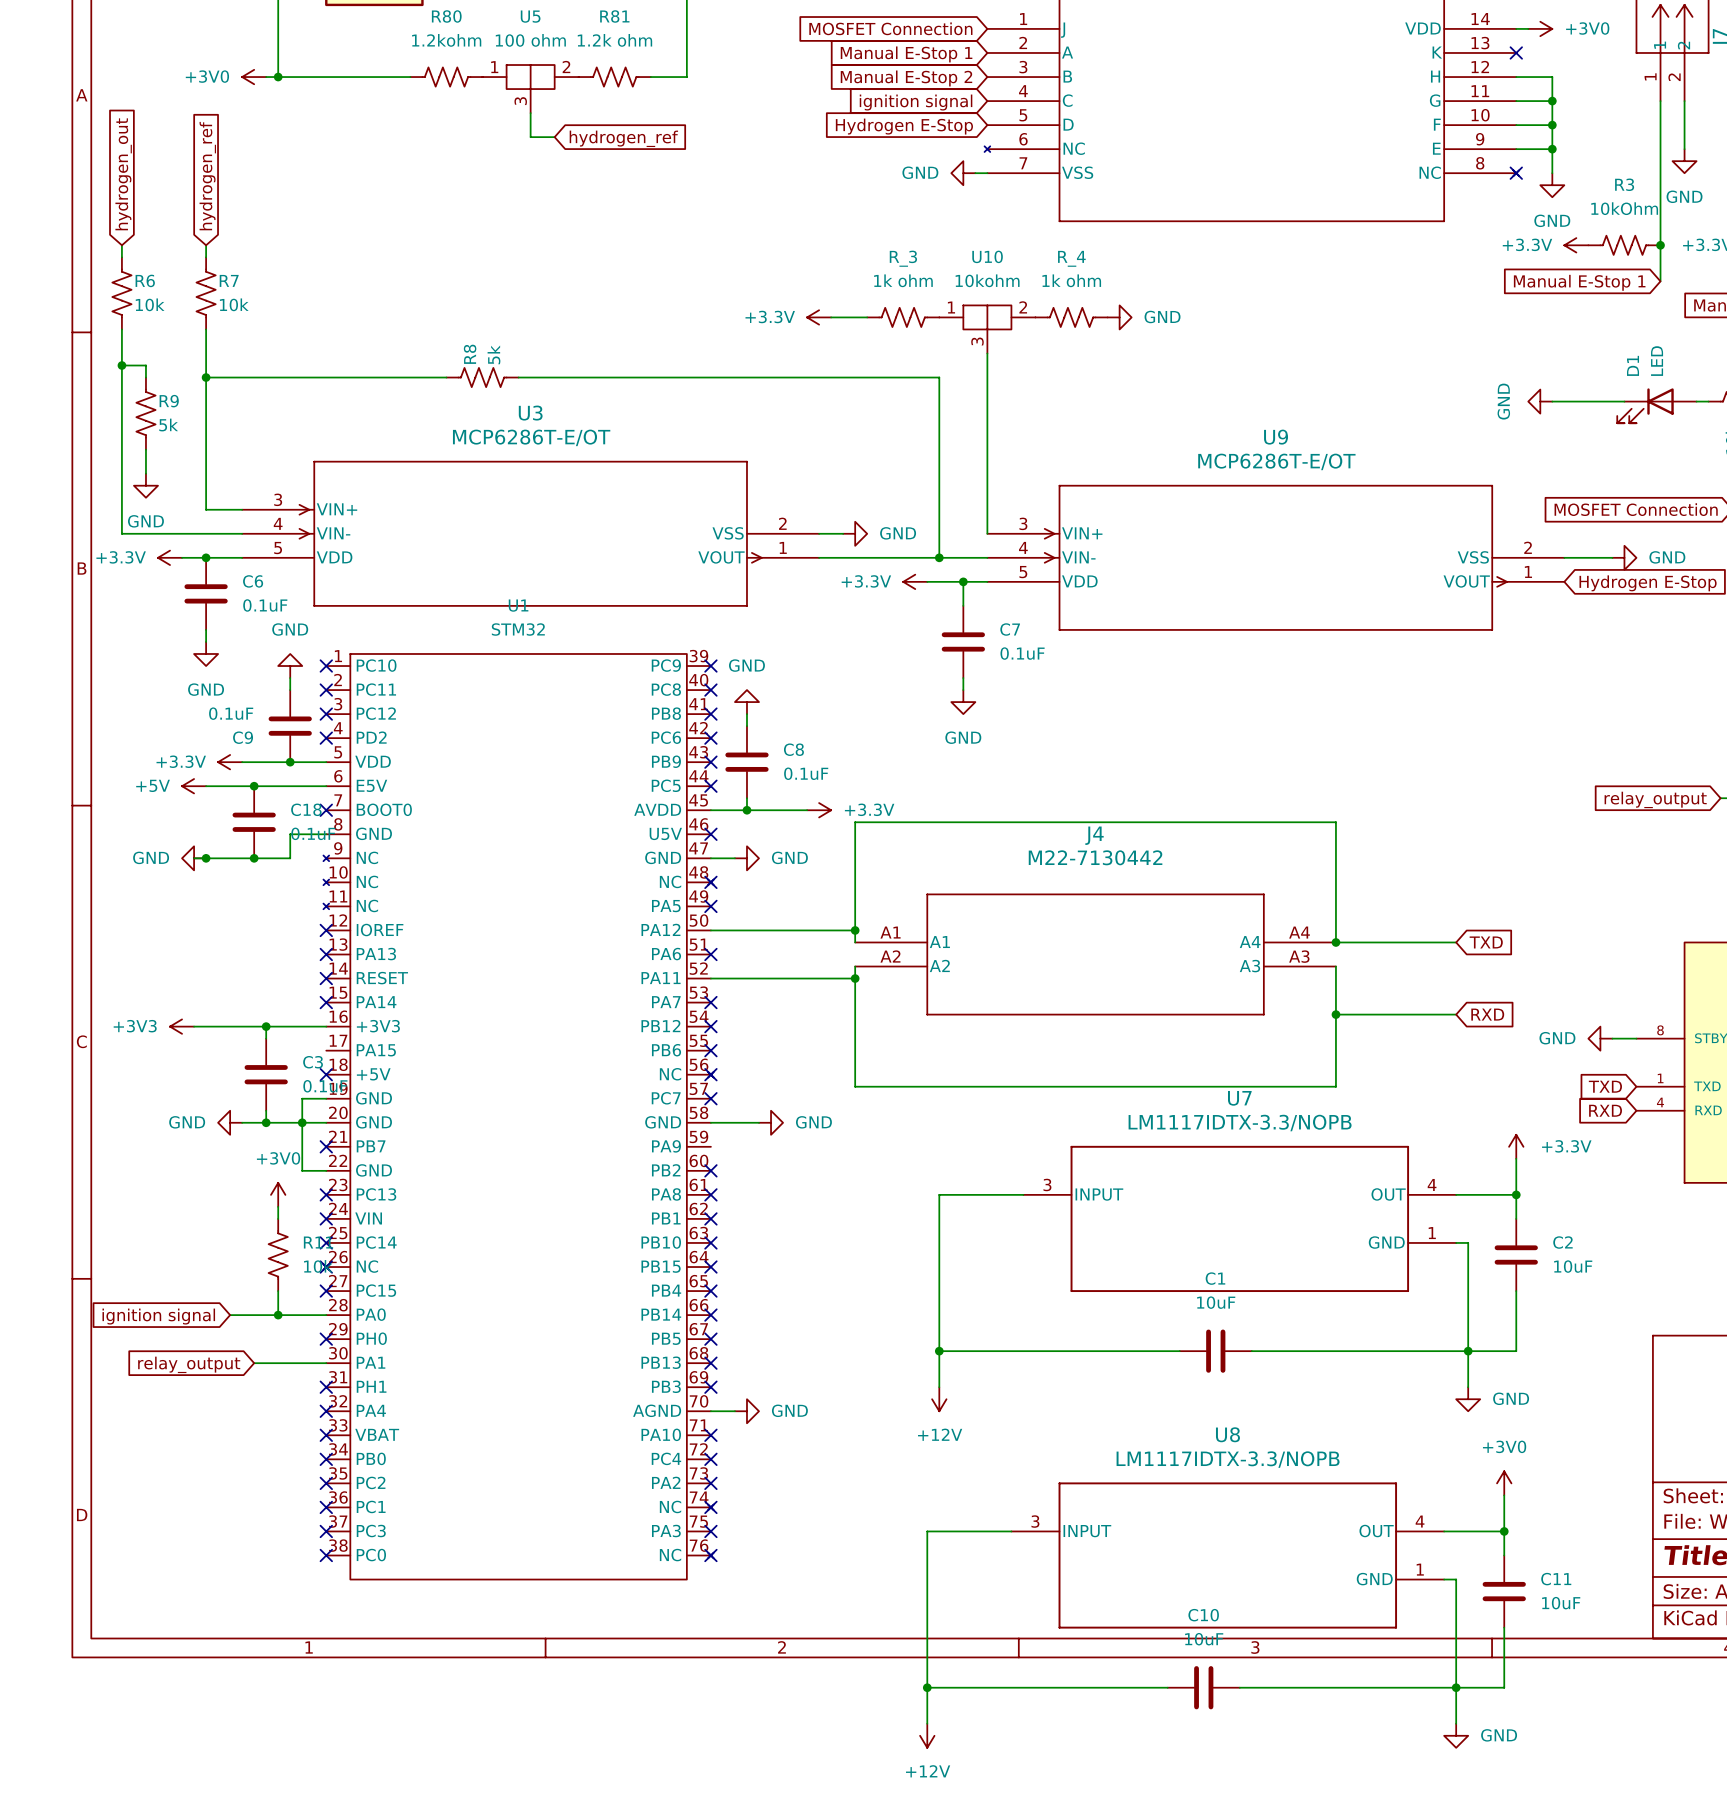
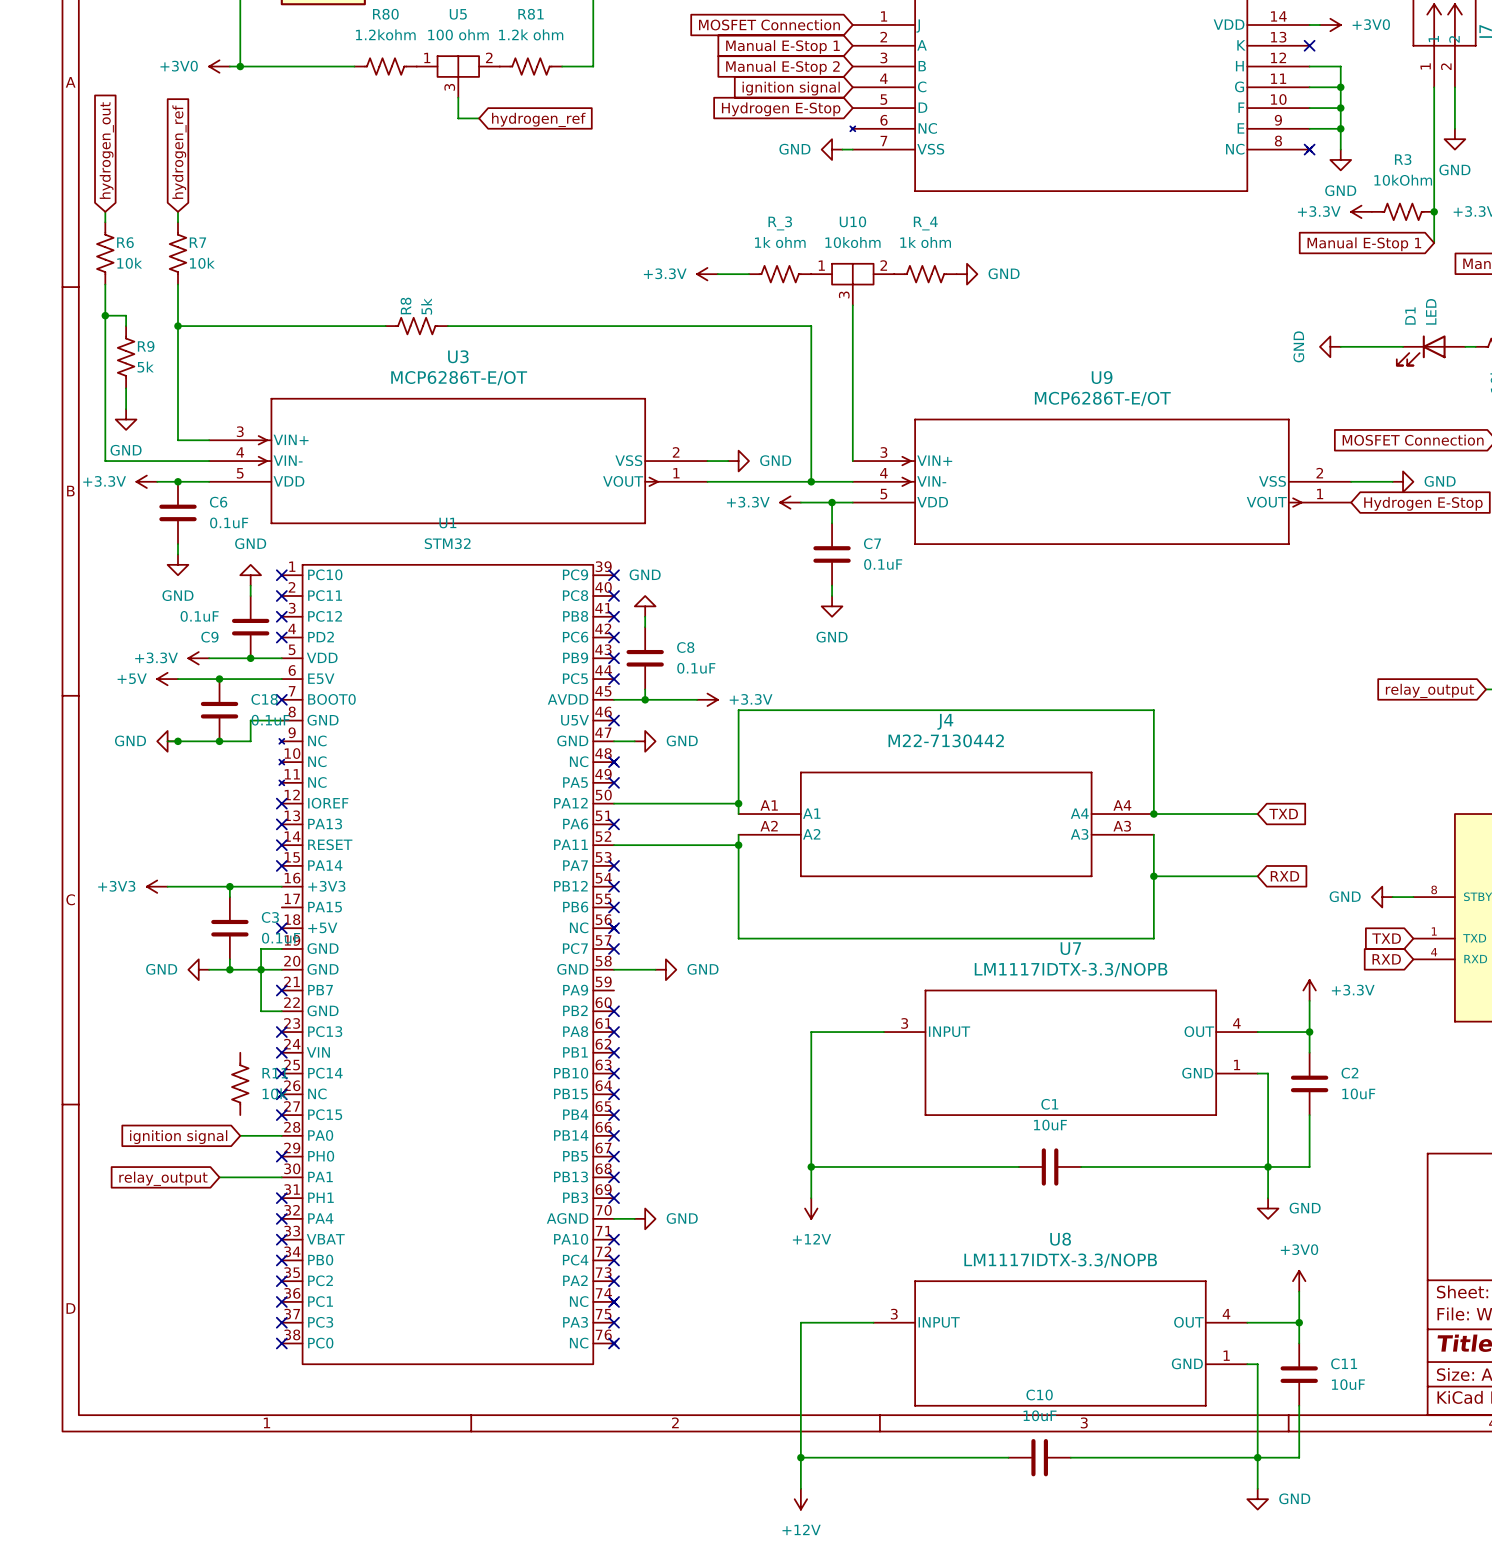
power symbol: +3V0 (278, 1194) -> none
wire: (278, 1206) (278, 1218) -> none
wire: (278, 1291) (278, 1315) (230, 1315) -> none
junction: (278, 1315) -> none
global label position: ignition signal (158, 1316) -> ignition signal (178, 1137)

